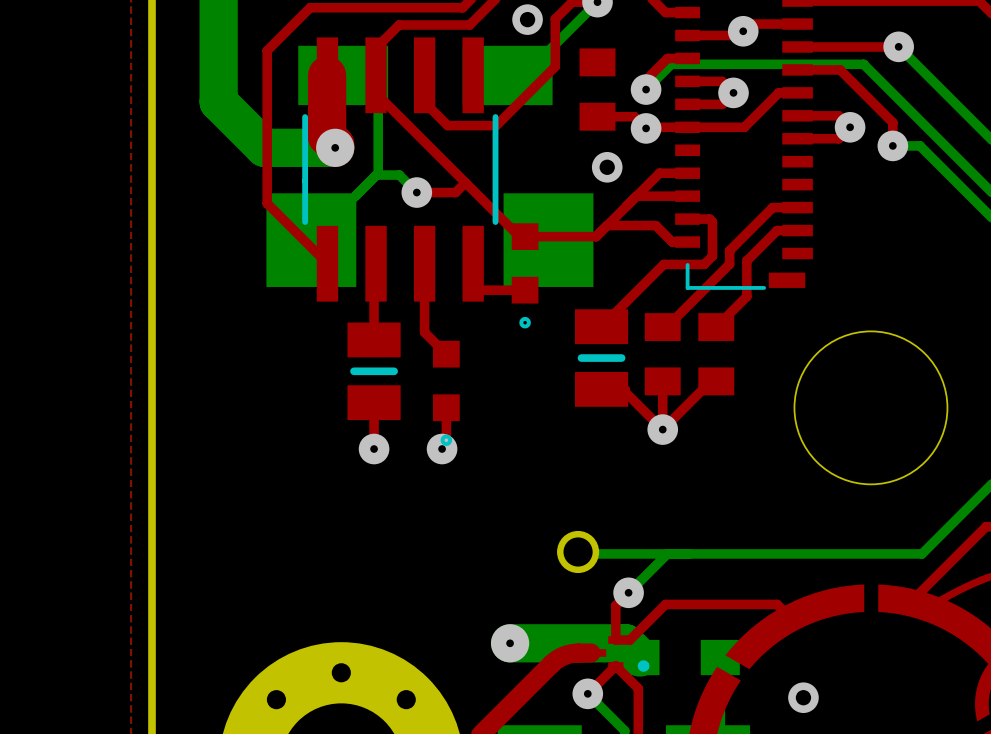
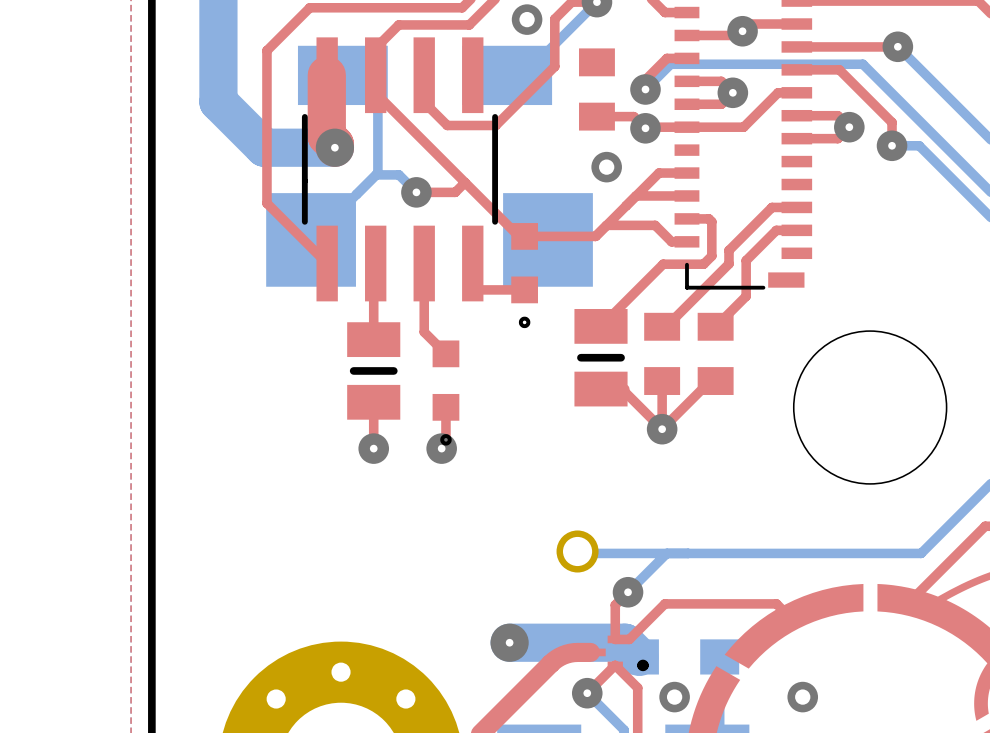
via: none -> (674, 697)

